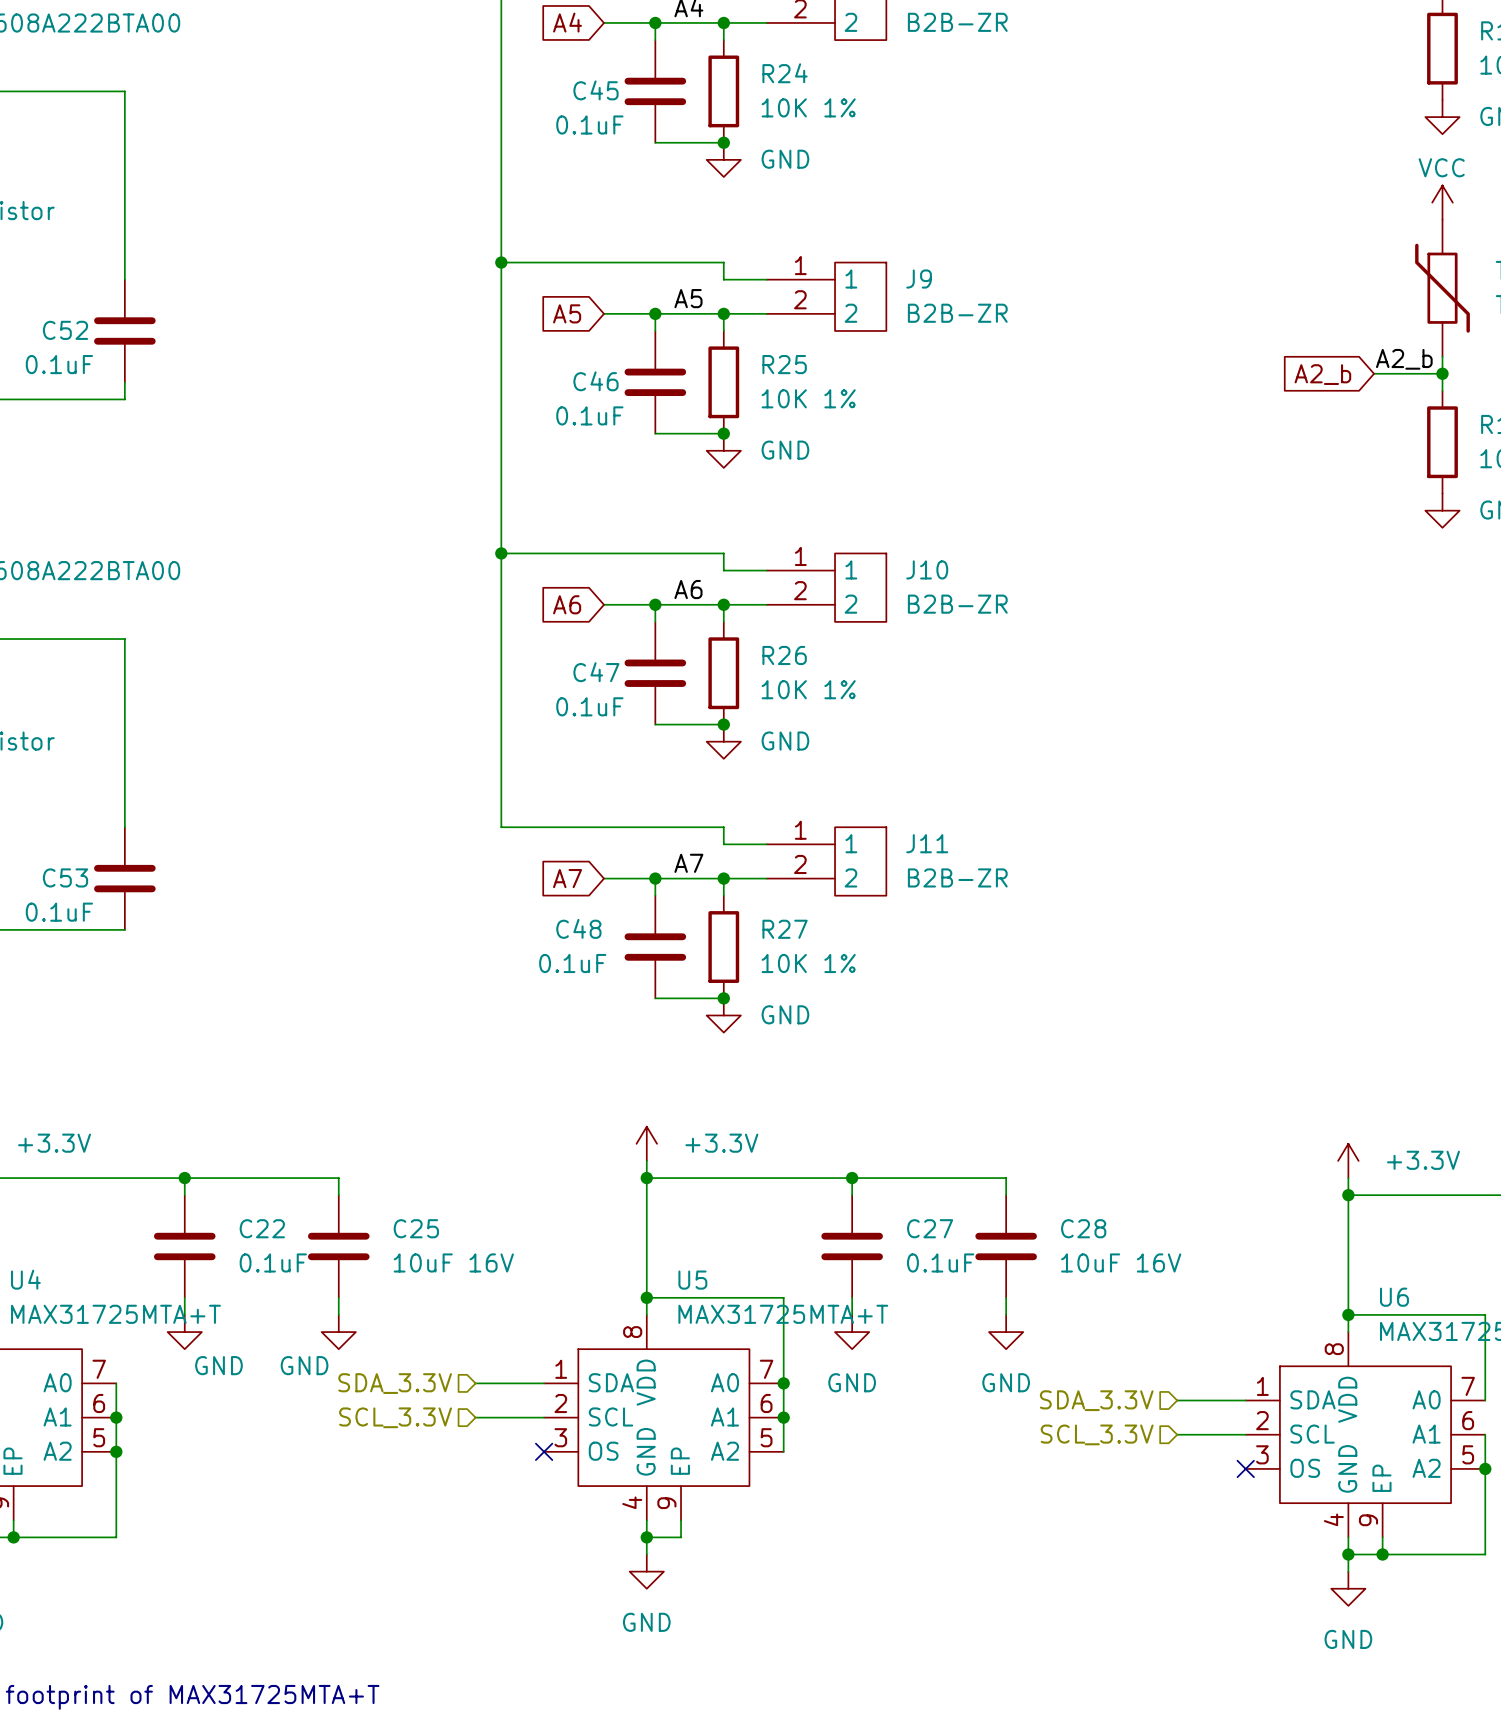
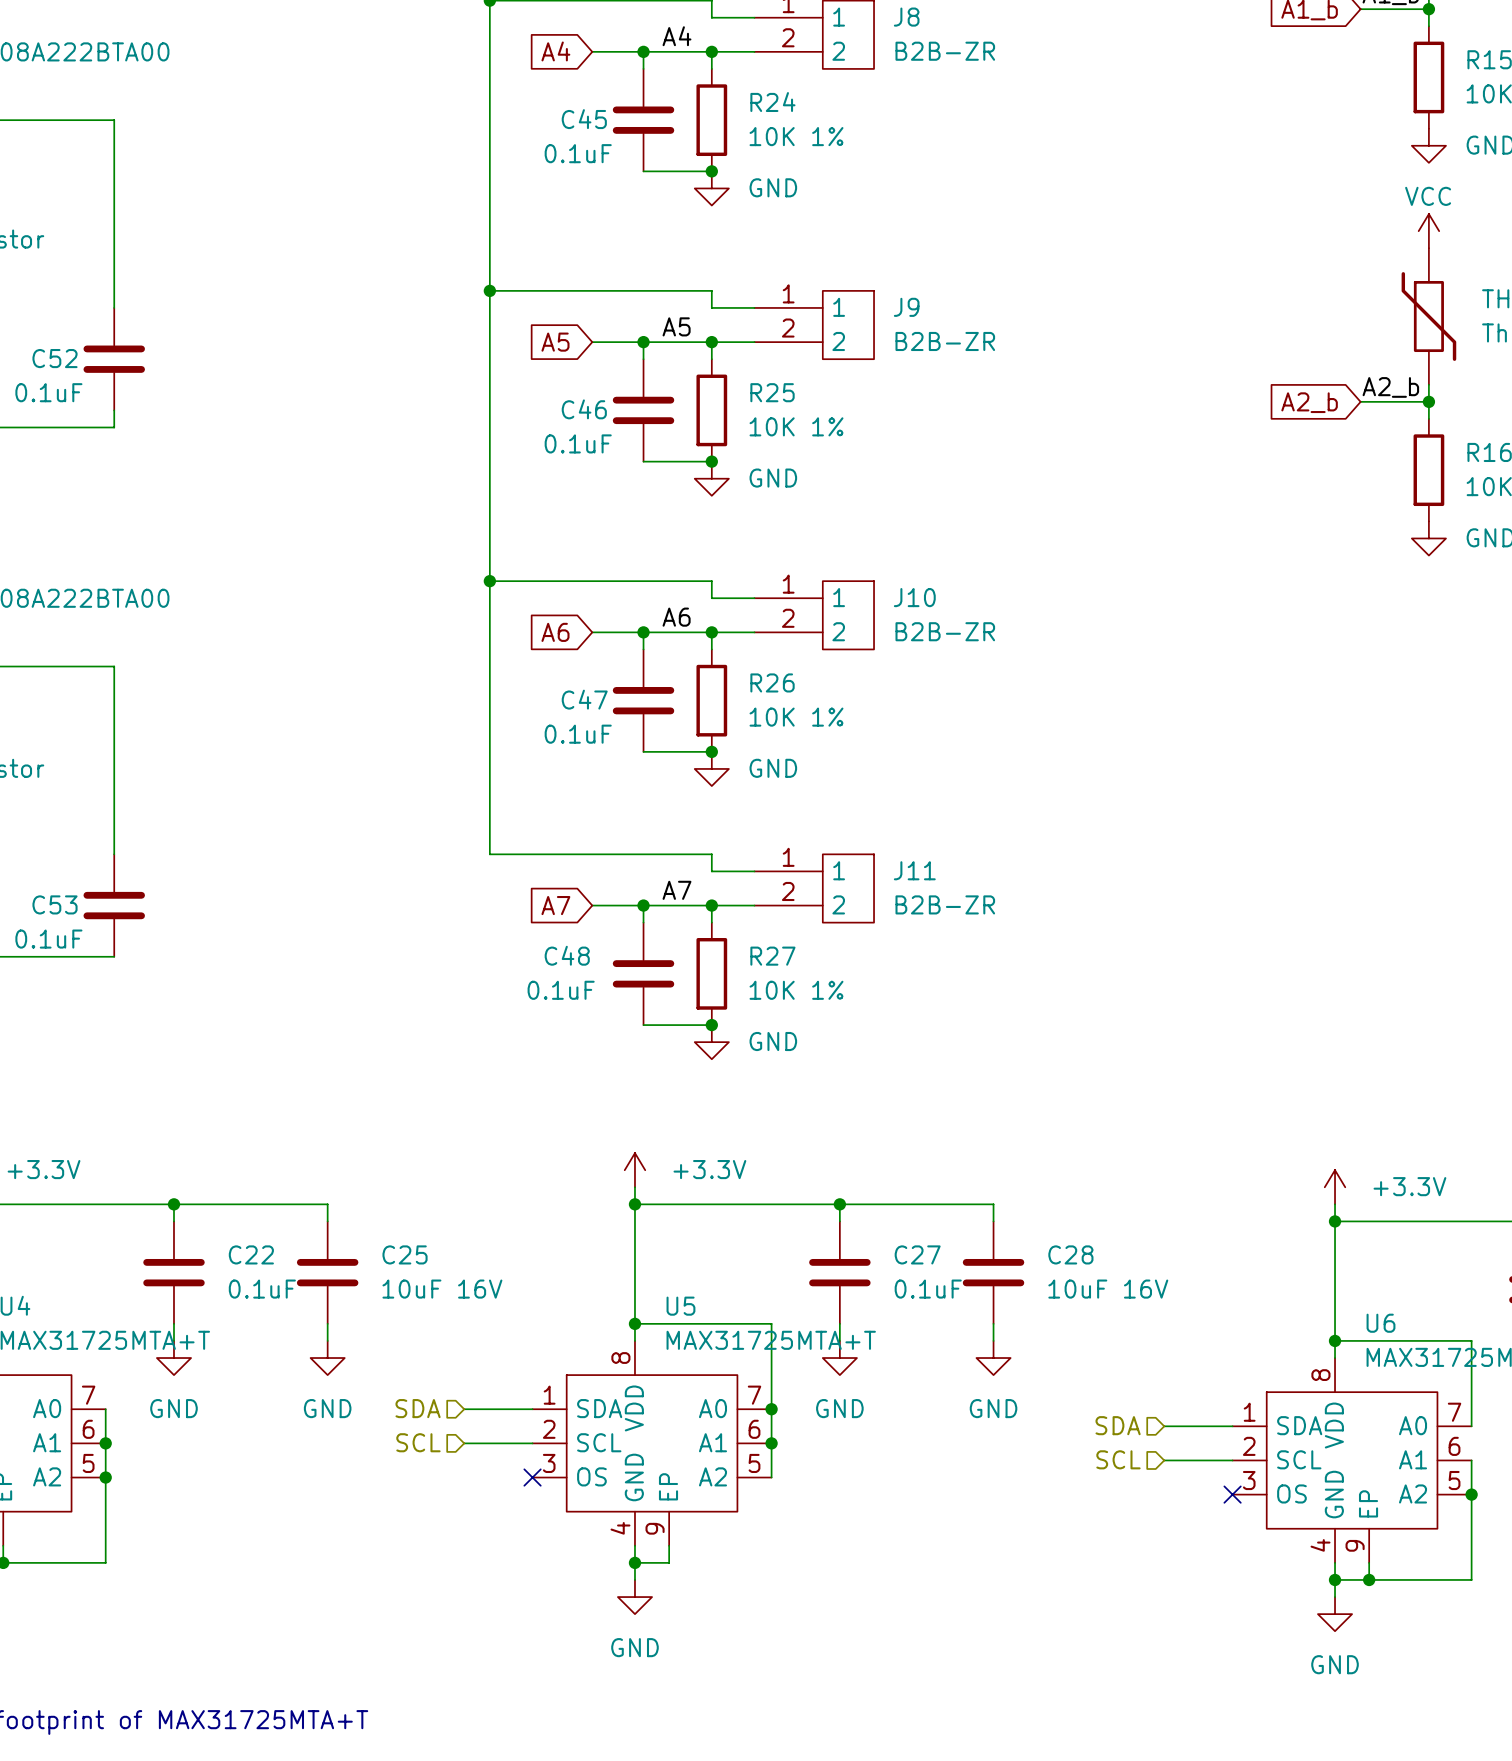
power symbol text position: GND (218, 1365) -> GND (173, 1408)
power symbol text position: GND (304, 1365) -> GND (327, 1408)
hierarchical label: SDA_3.3V (395, 1383) -> SDA (418, 1408)
hierarchical label: SDA_3.3V (1096, 1400) -> SDA (1118, 1425)
hierarchical label: SCL_3.3V (395, 1417) -> SCL (418, 1442)
hierarchical label: SCL_3.3V (1097, 1434) -> SCL (1118, 1459)

